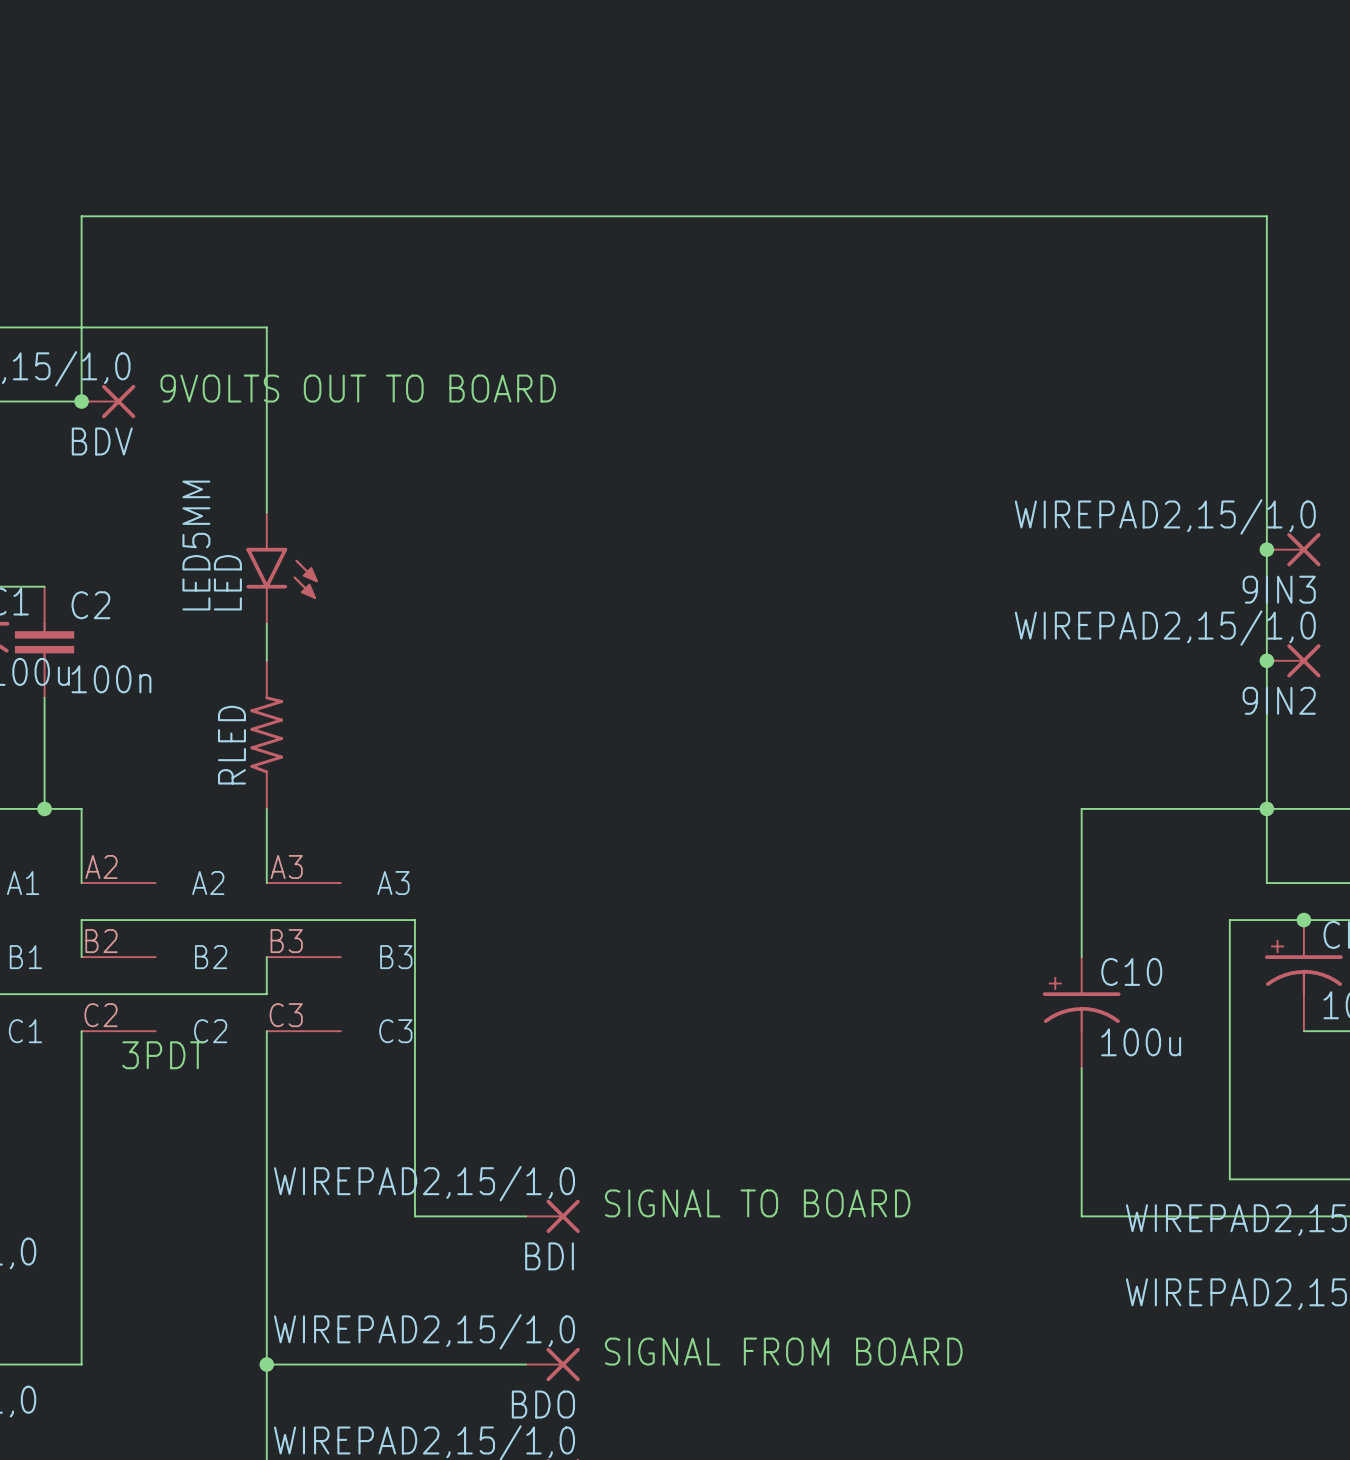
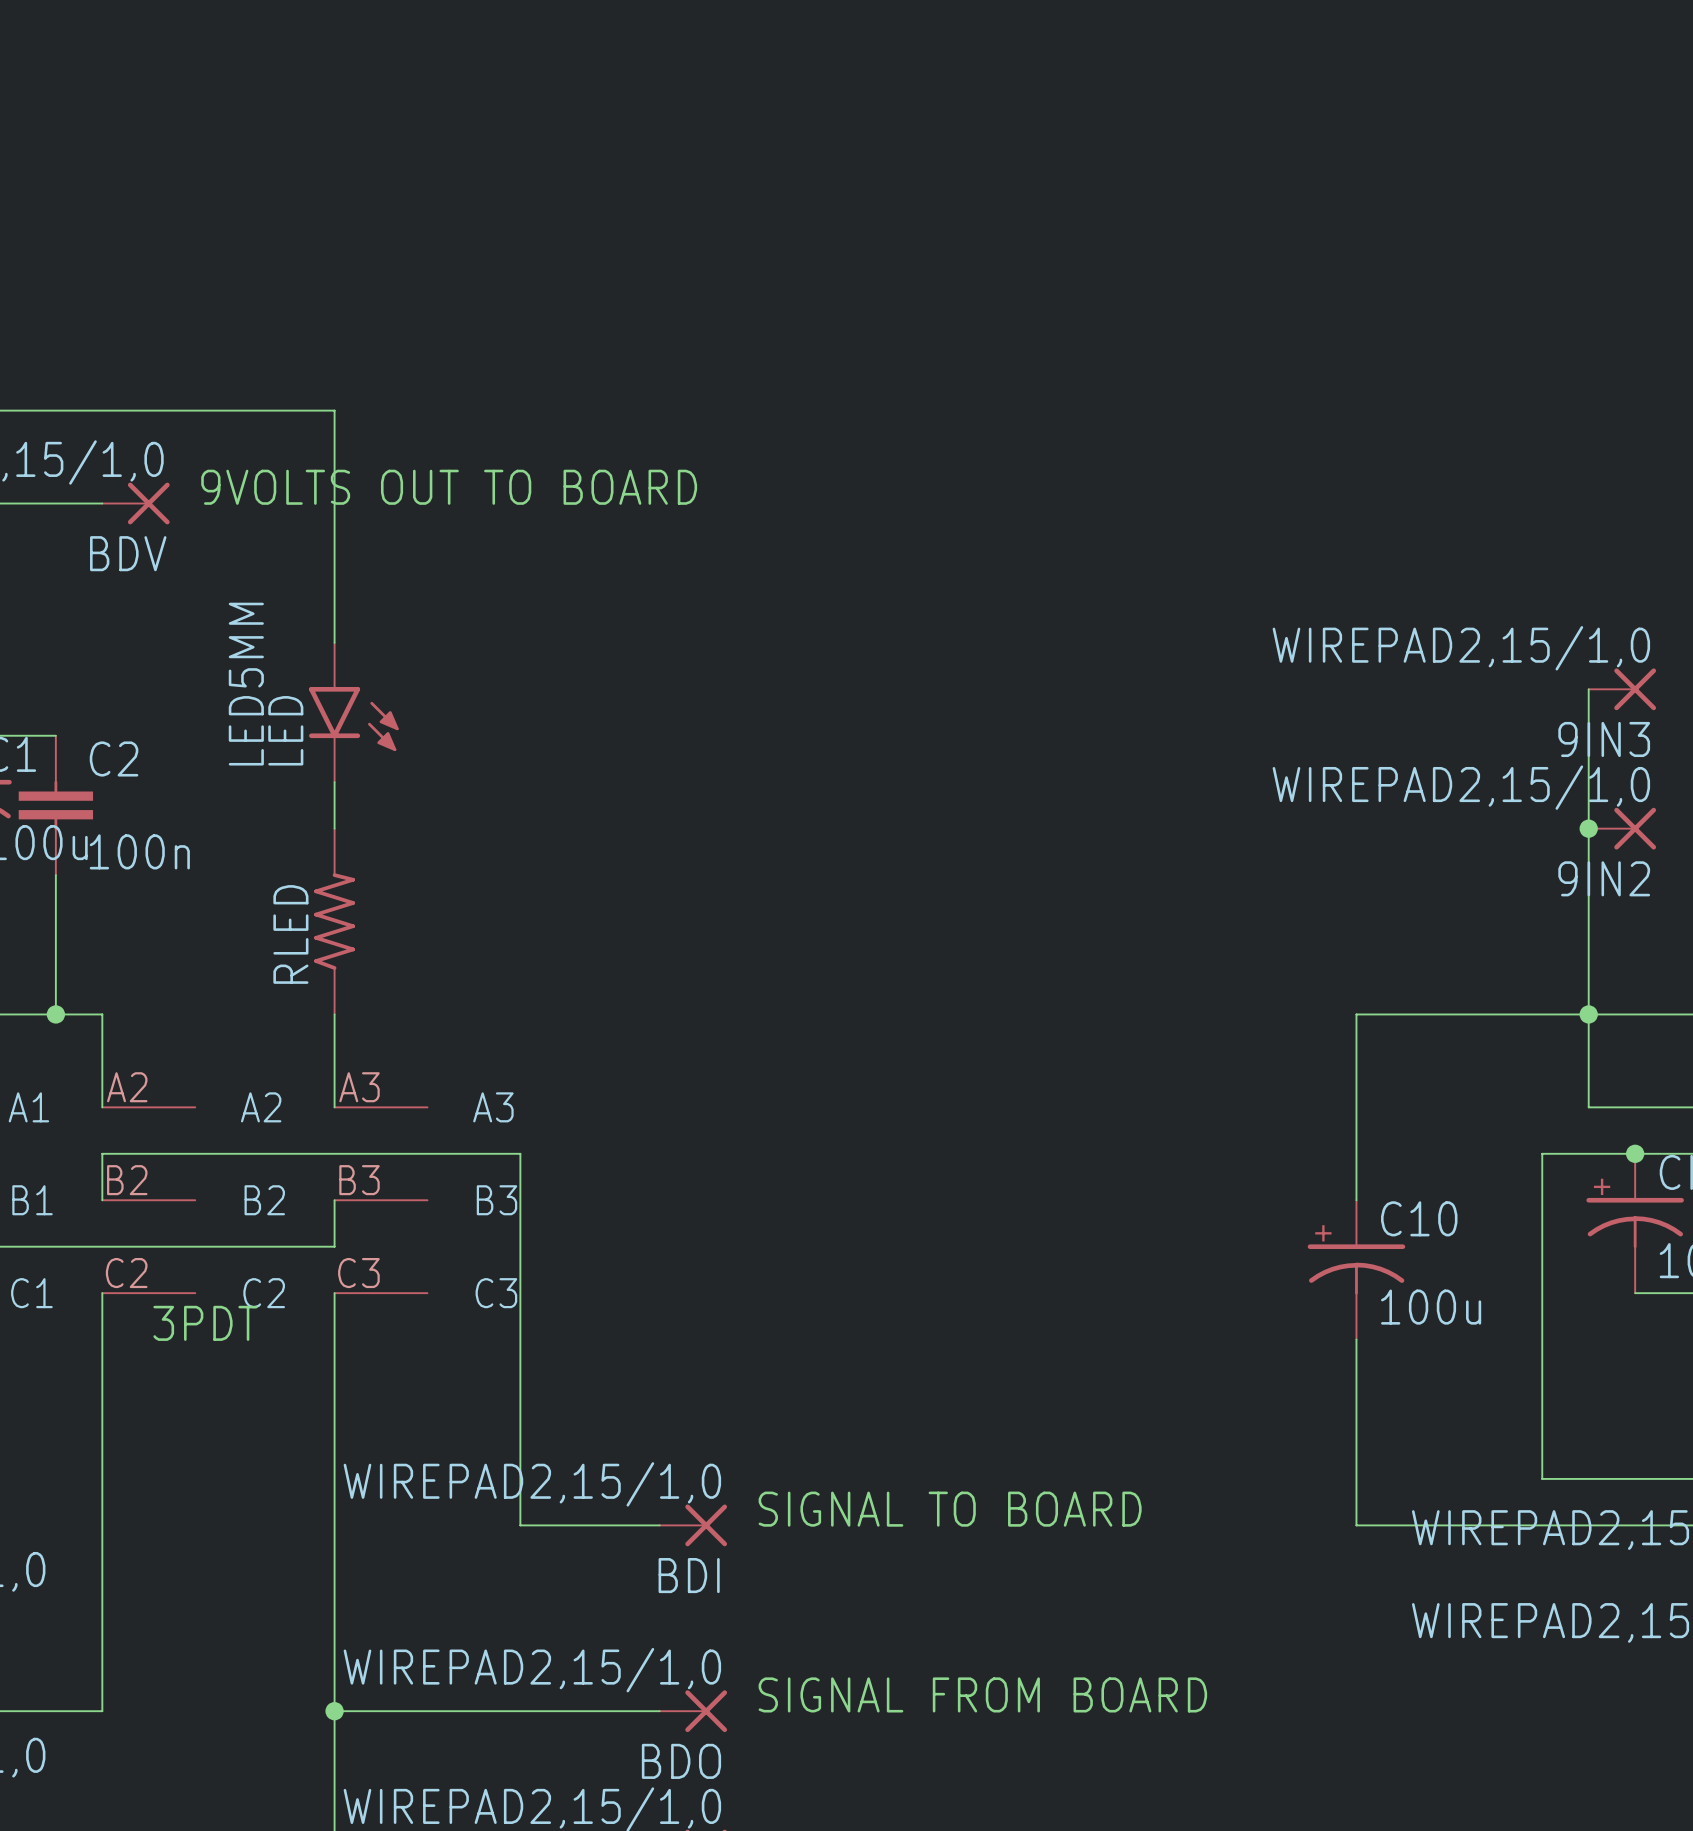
wire: (81, 401) (81, 216) (1266, 216) (1266, 549) -> none
junction: (81, 401) -> none
junction: (1266, 549) -> none

